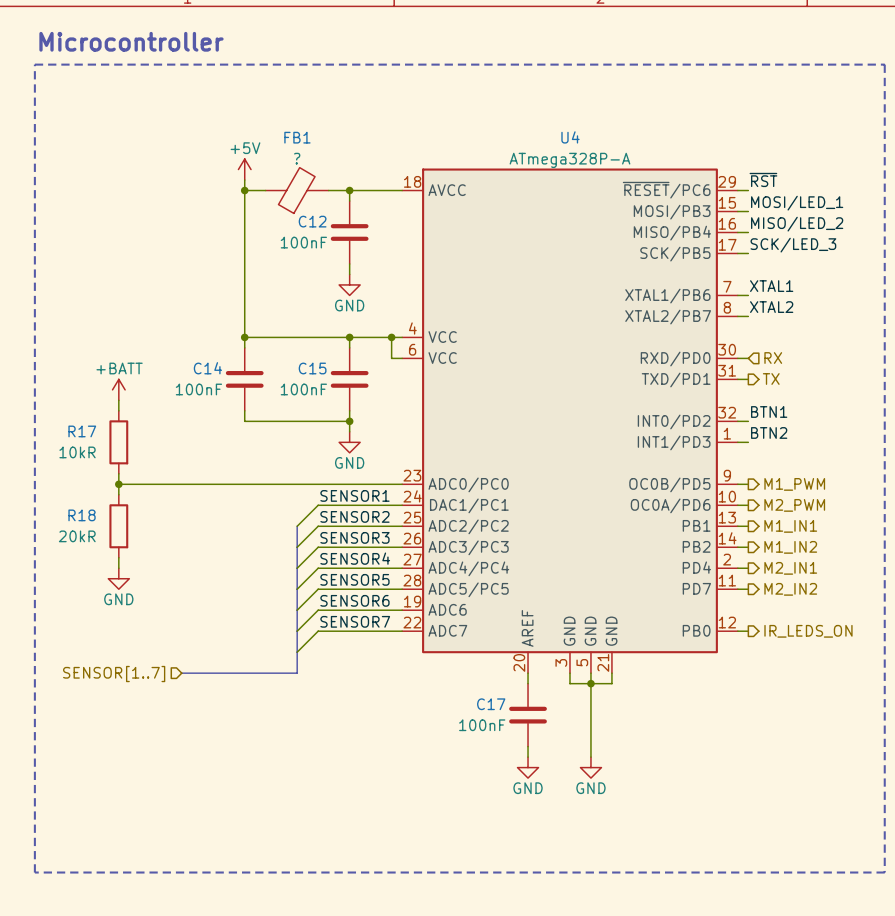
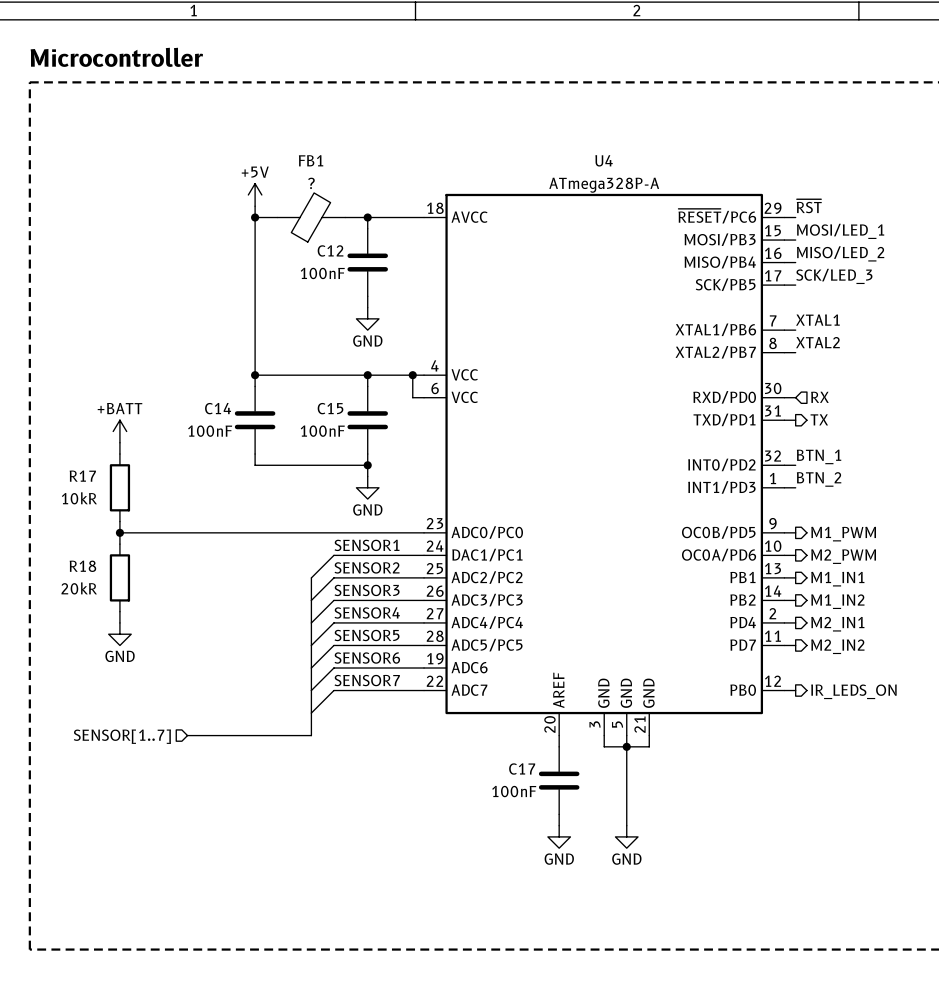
label: BTN1 (769, 411) -> BTN_1 (819, 456)
label: BTN2 (769, 432) -> BTN_2 (819, 479)

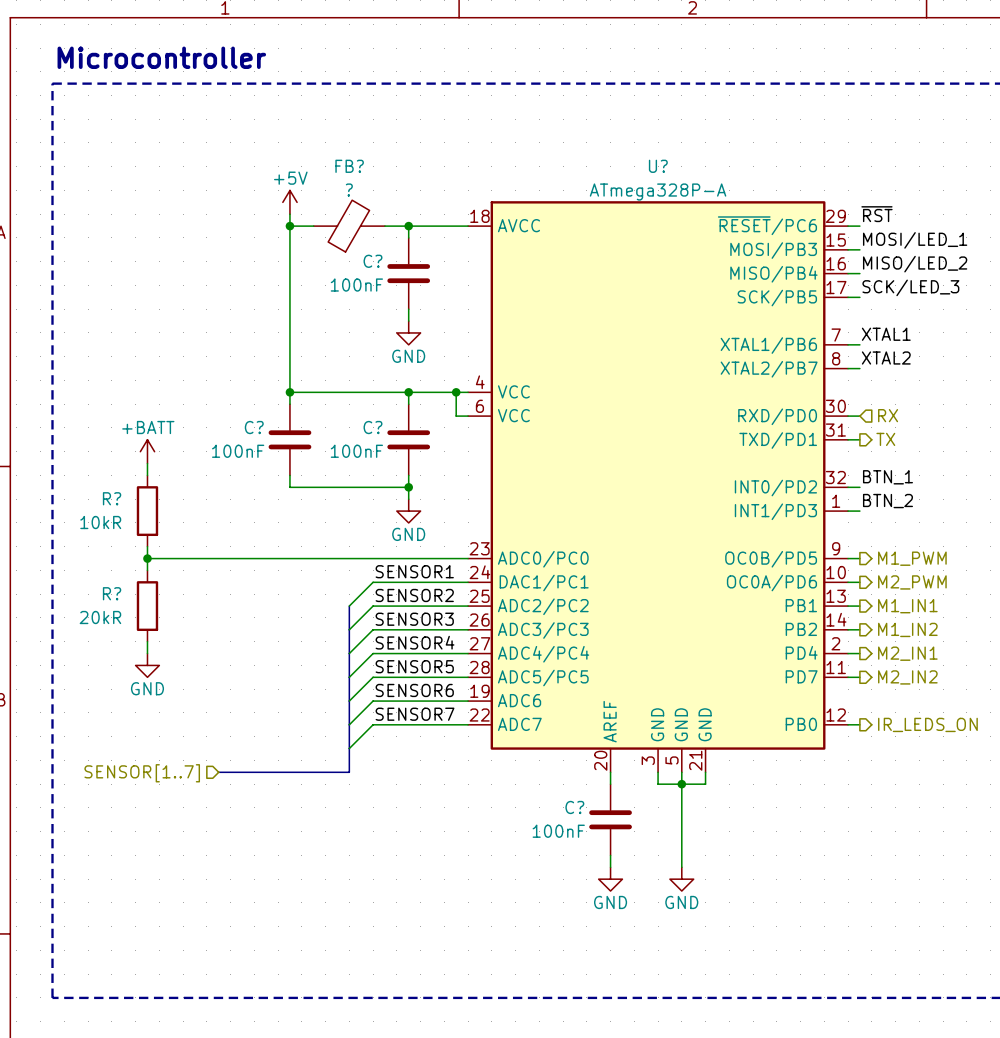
FB1 name: FB1 (311, 160) -> FB? (349, 166)
U4 name: U4 (604, 160) -> U? (658, 166)
C12 name: C12 (330, 250) -> C? (372, 261)
C14 name: C14 (218, 408) -> C? (254, 427)
C15 name: C15 (330, 408) -> C? (372, 427)
R17 name: R17 (82, 476) -> R? (112, 498)
R18 name: R18 (82, 566) -> R? (112, 593)
C17 name: C17 (522, 769) -> C? (574, 807)

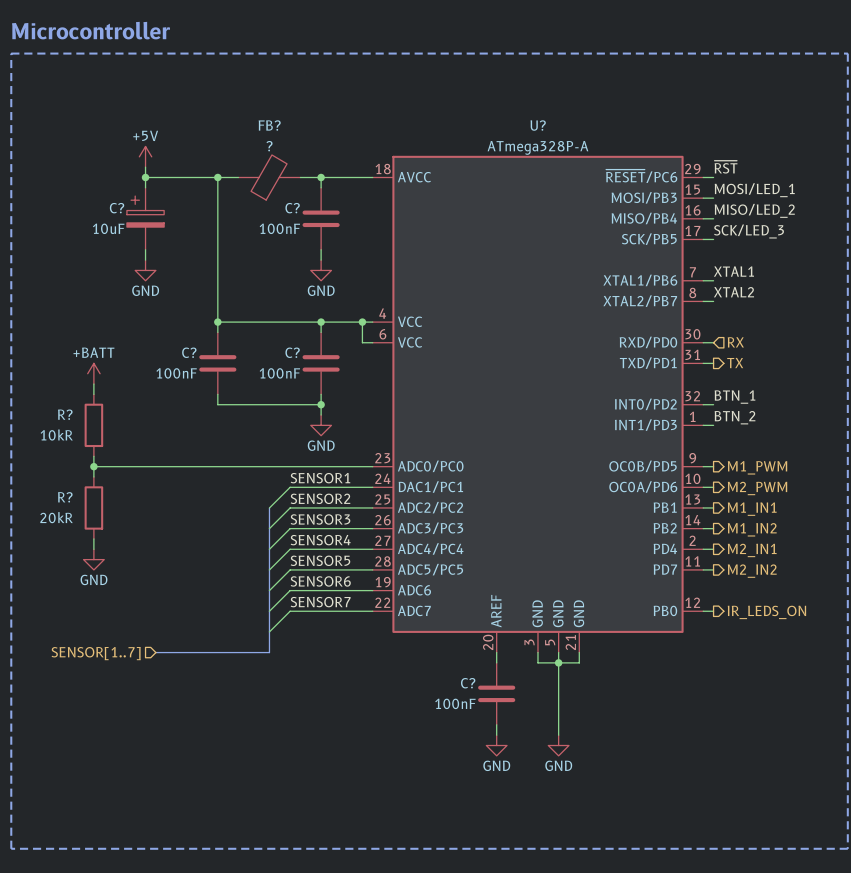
power symbol position: +5V (289, 202) -> +5V (145, 156)
wire: none -> (145, 167) (145, 187)
wire: (289, 214) (289, 226) -> (145, 177) (217, 177)
junction: none -> (145, 177)
C?: none -> 10uF (145, 218)
wire: none -> (145, 249) (145, 260)
power symbol: none -> GND (145, 270)

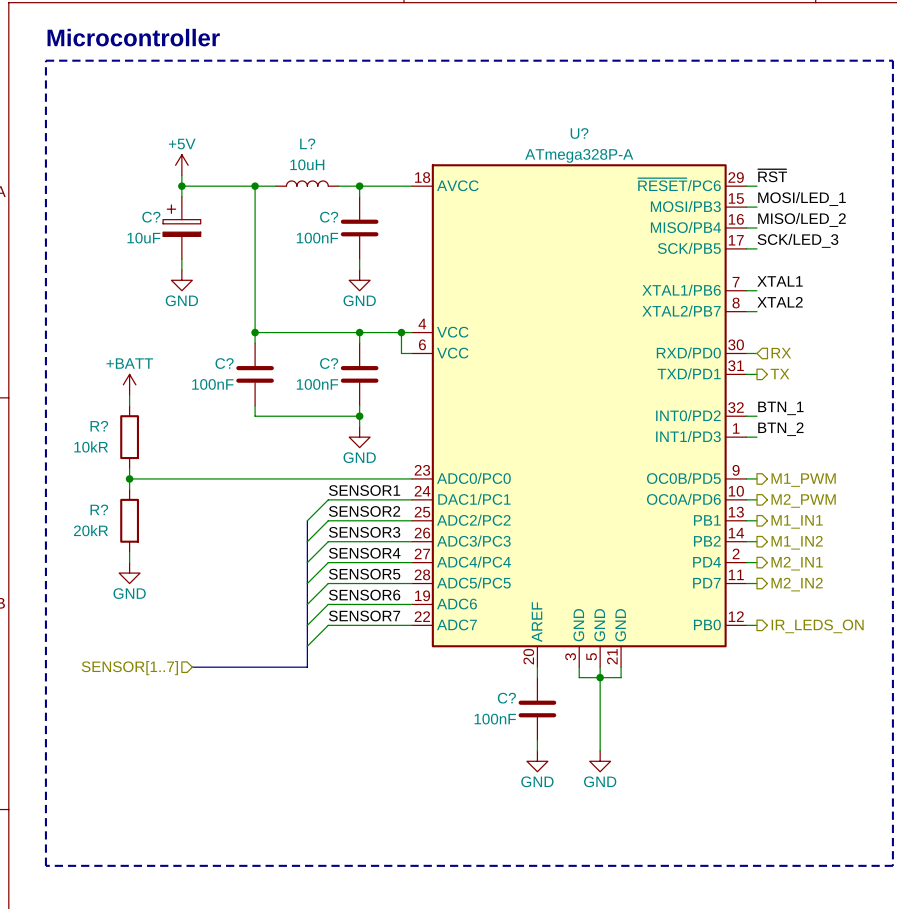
L?: none -> 10uH (307, 183)
FB?: ? (269, 177) -> none

